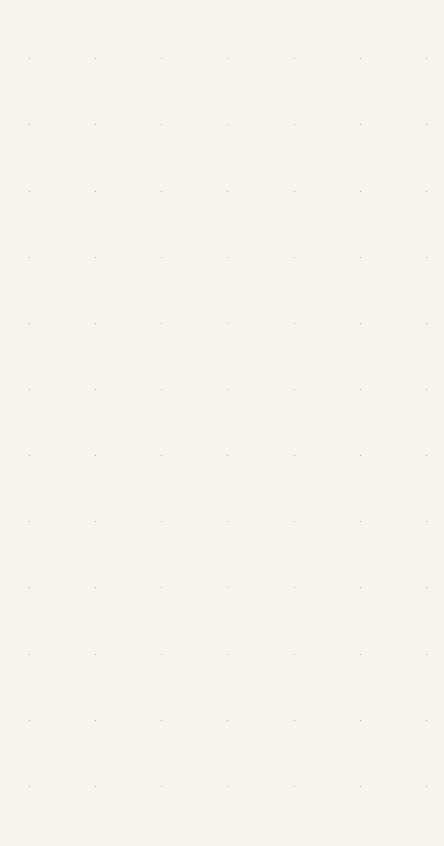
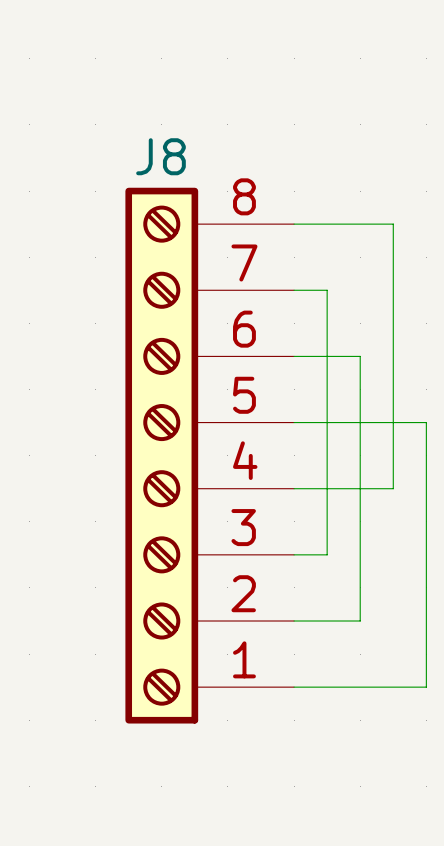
wire: none -> (294, 224) (393, 224) (393, 488) (294, 488)
wire: none -> (294, 290) (327, 290) (327, 554) (294, 554)
wire: none -> (294, 356) (360, 356) (360, 621) (294, 621)
wire: none -> (294, 422) (426, 422) (426, 687) (294, 687)
J8: none -> (209, 455)

